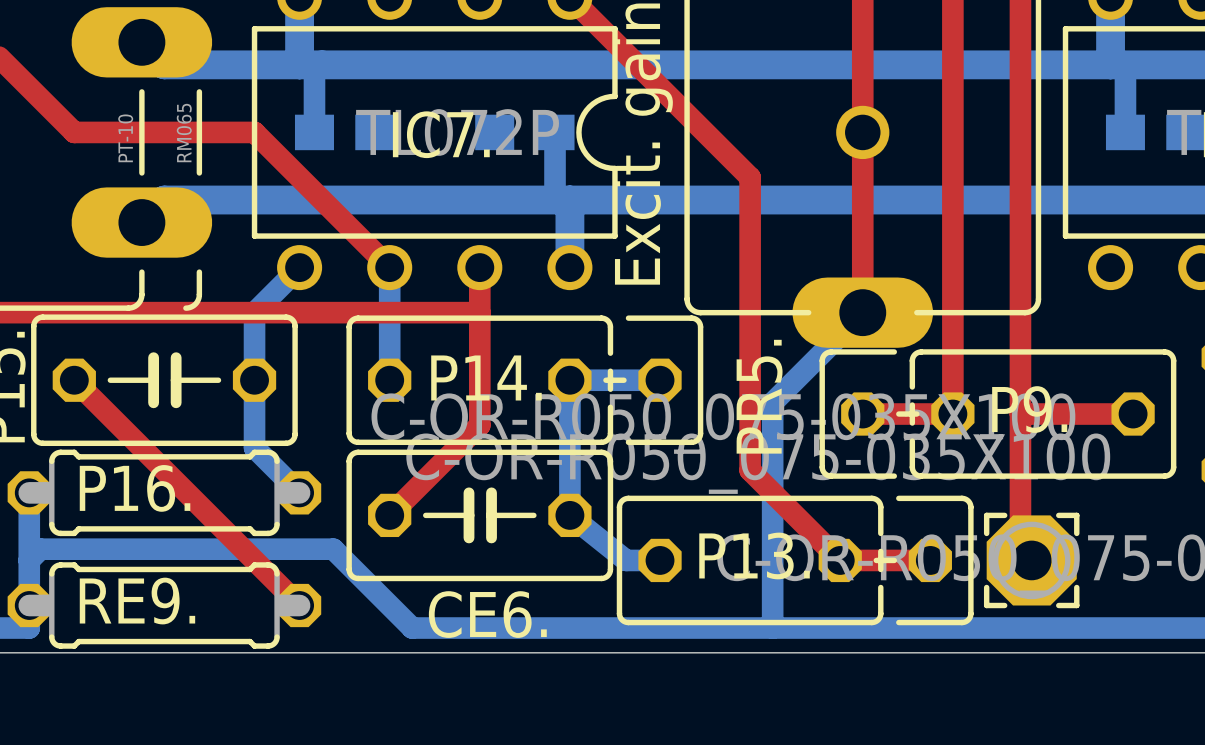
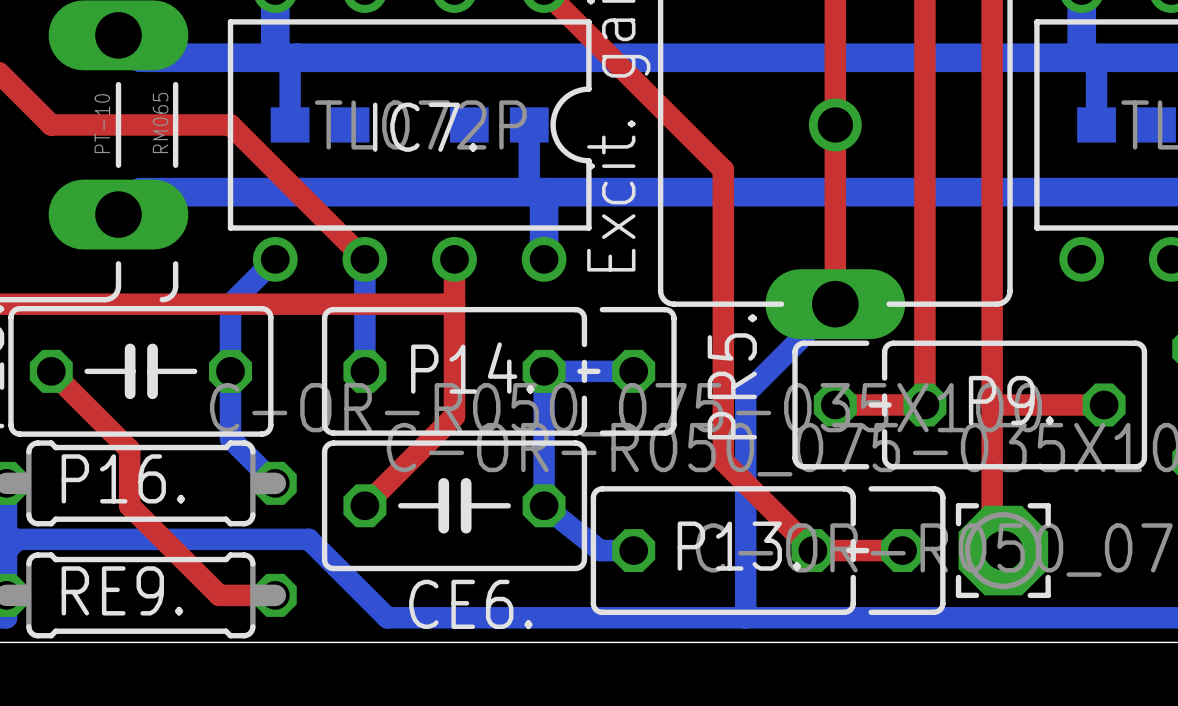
top track: (153, 459) (299, 605) -> (129, 449) (129, 505) (219, 595) (275, 595)

